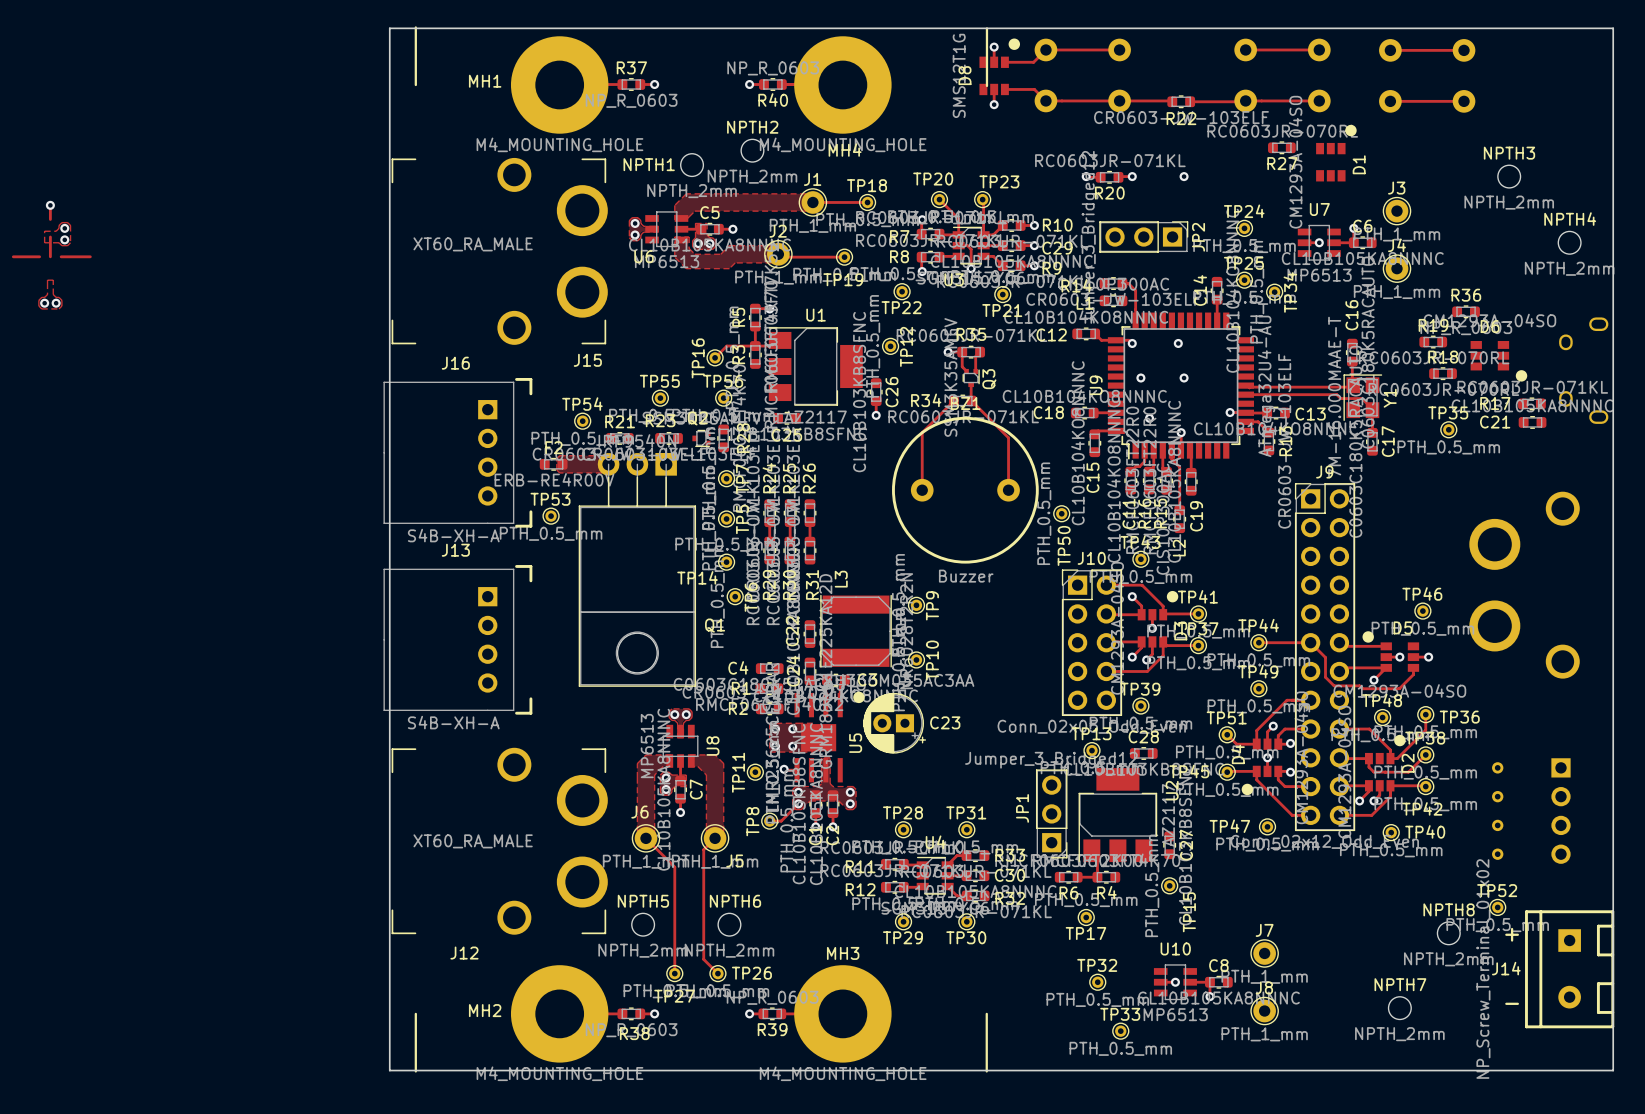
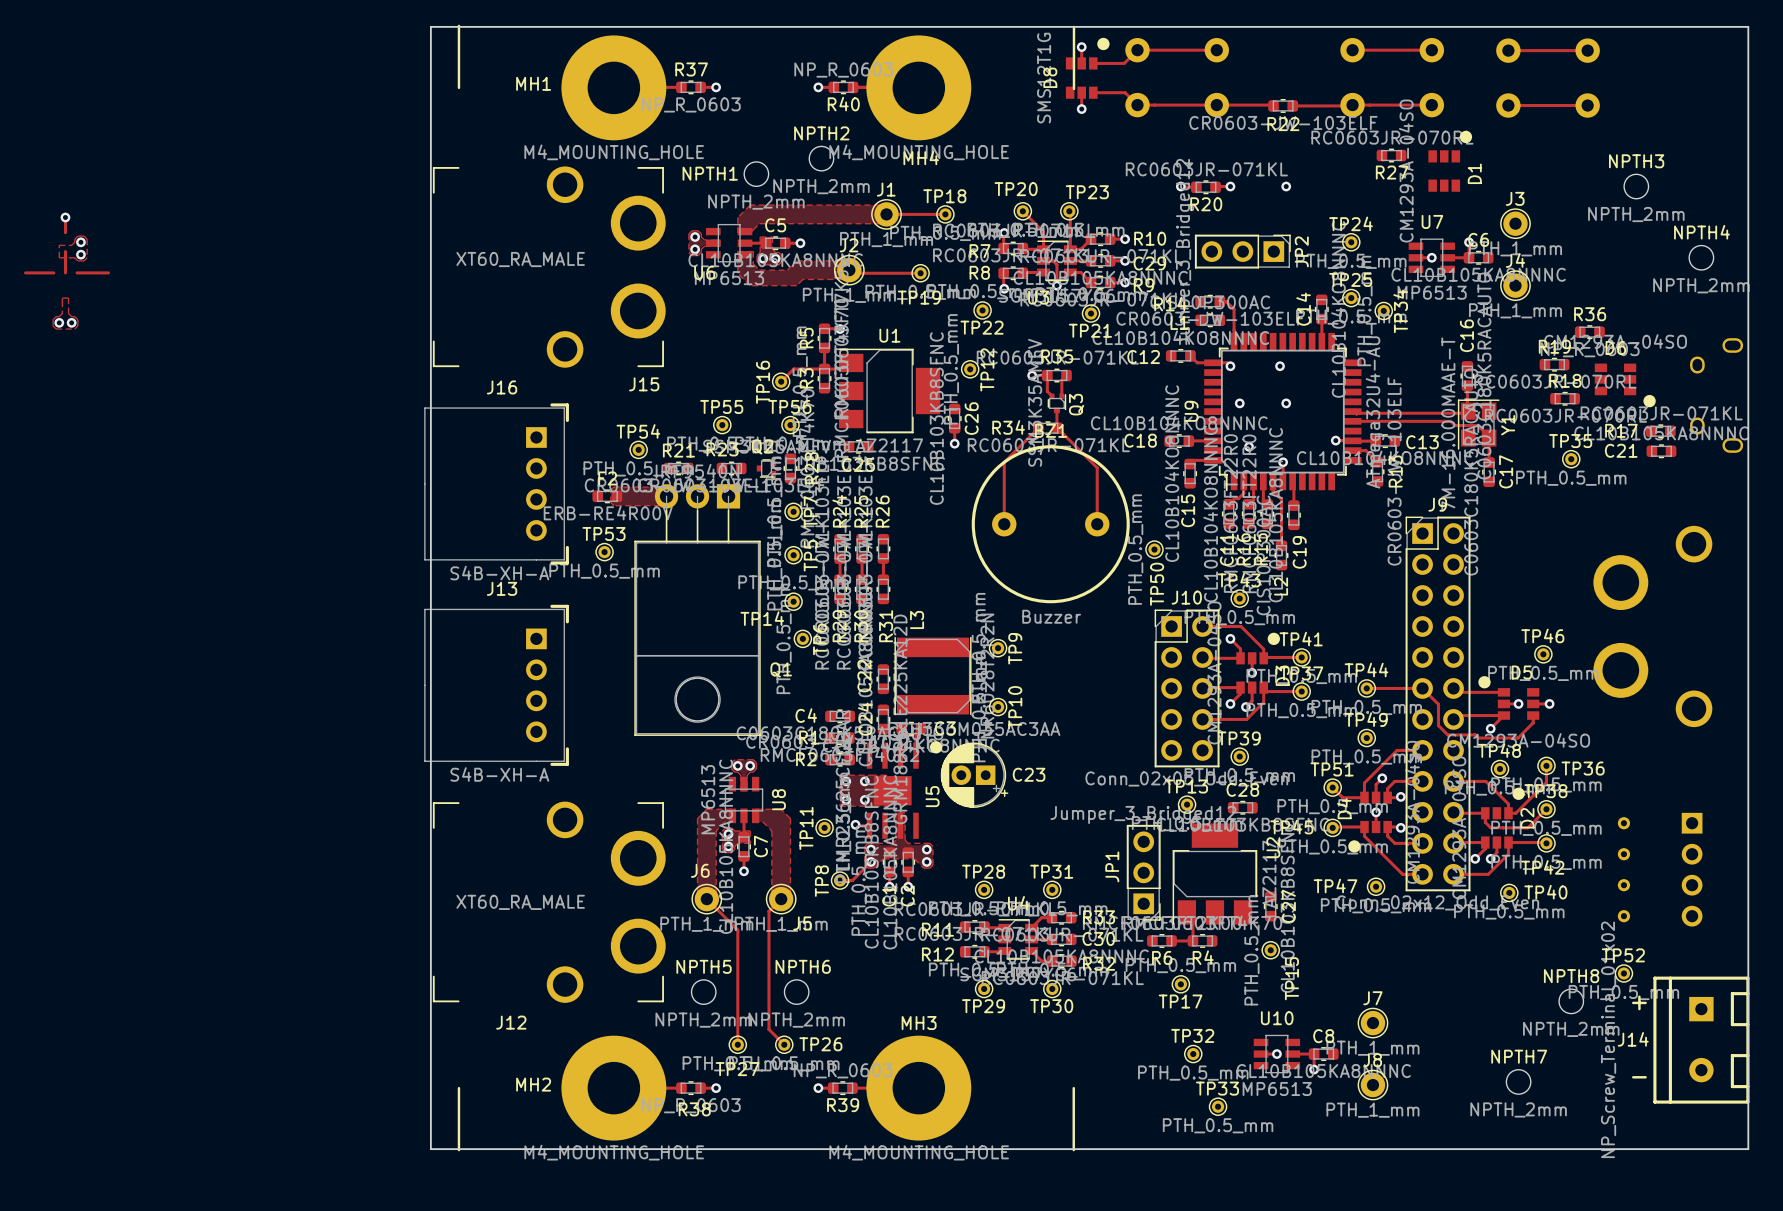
J16 footprint: [383, 378, 533, 528] -> [424, 403, 569, 565]
J13 footprint: [383, 565, 533, 715] -> [424, 604, 569, 766]

